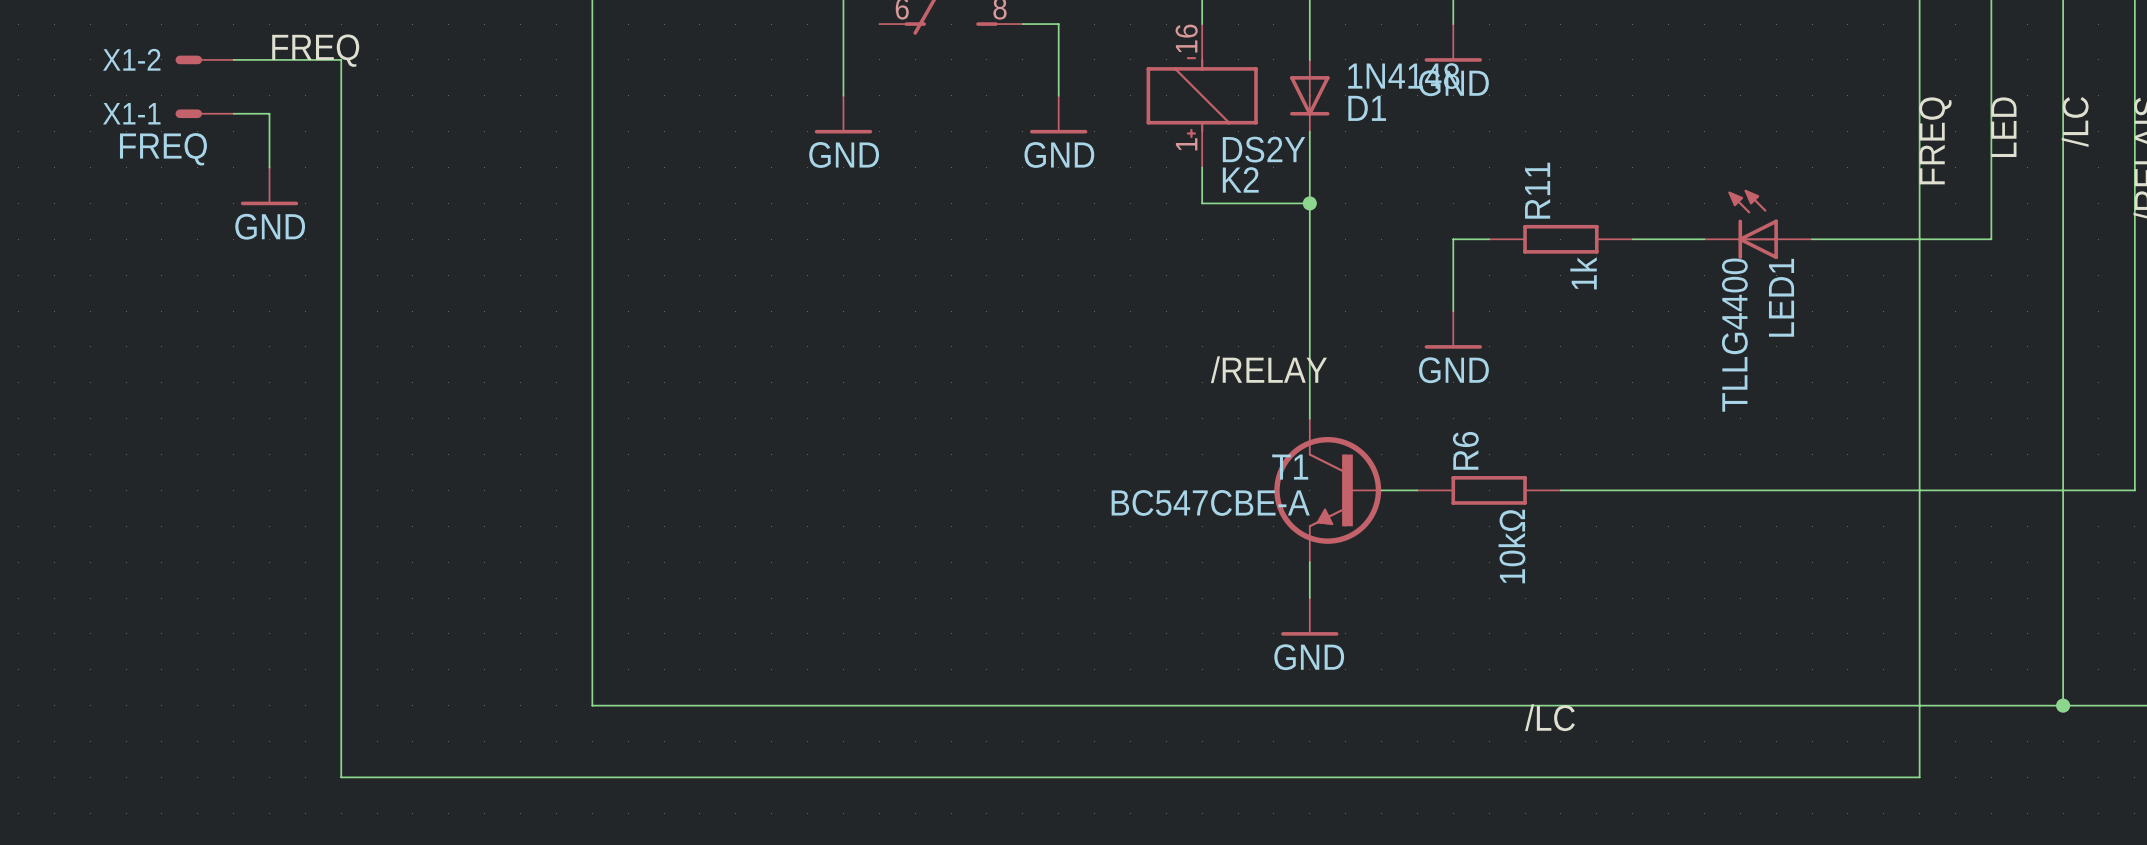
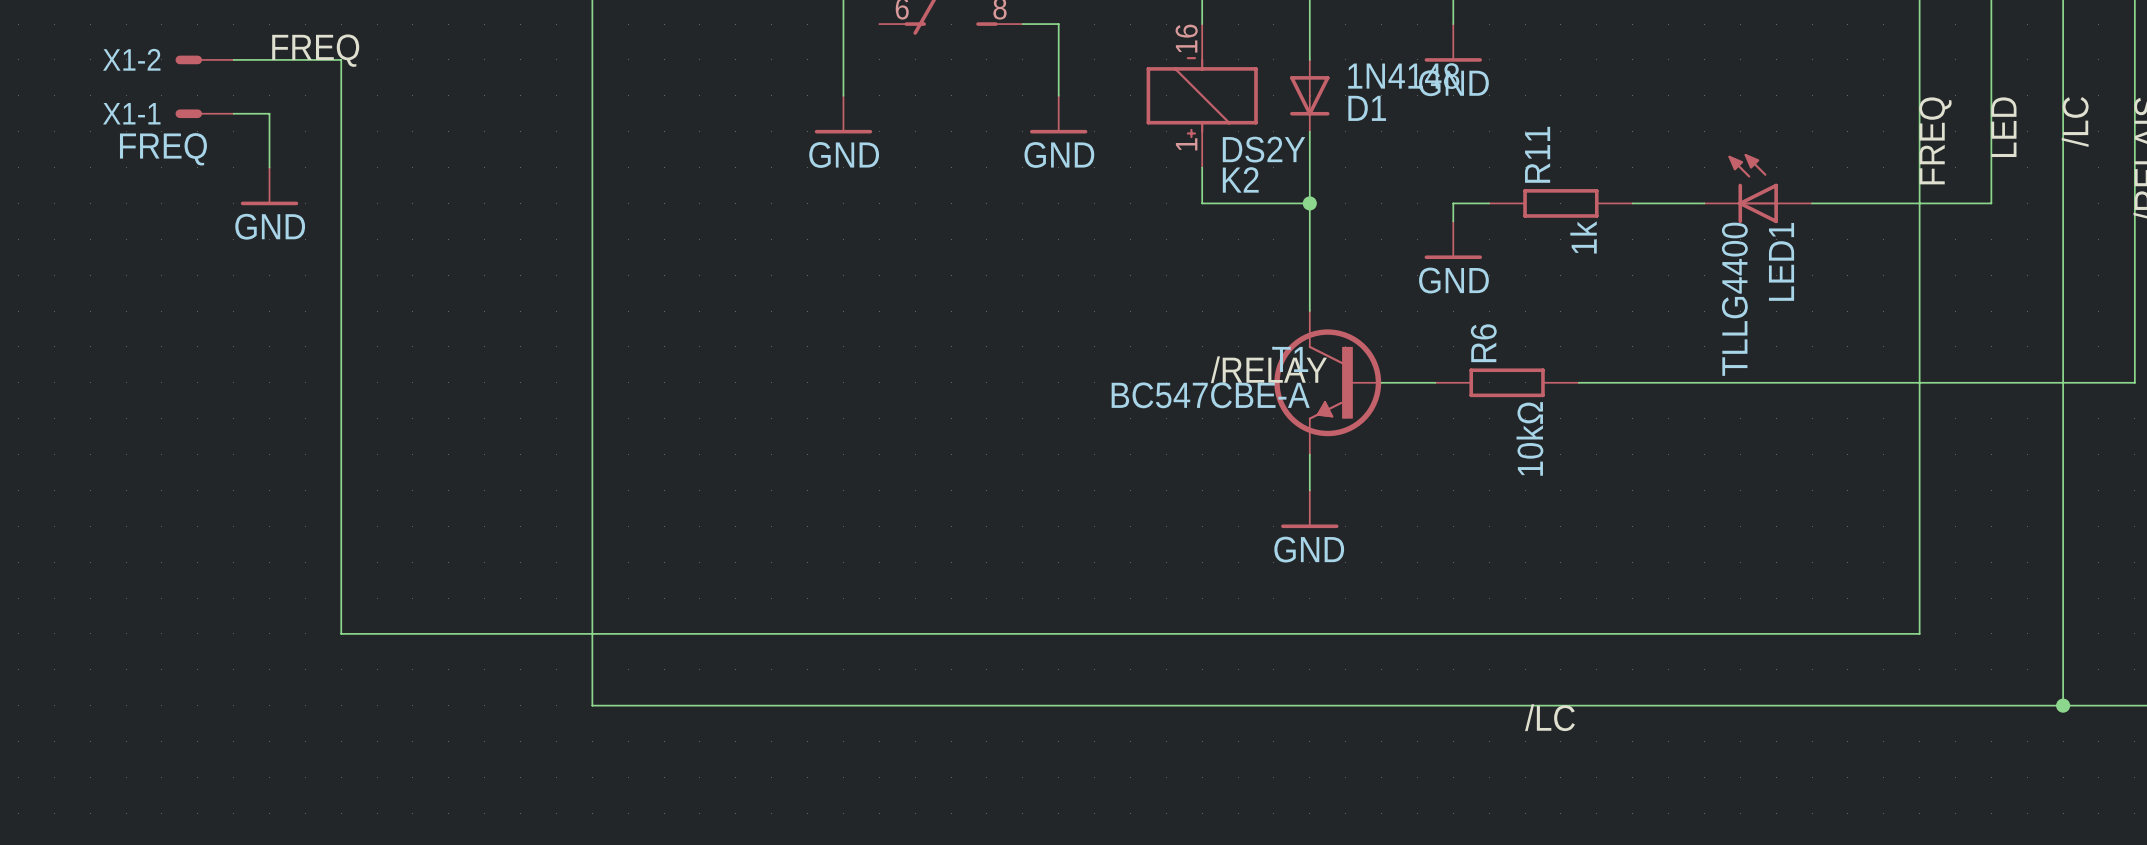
wire: none -> (1489, 203) (1453, 203) (1453, 221)
wire: (1991, 203) (1991, 239) (1812, 239) -> (1991, 203) (1812, 203)
LED1 position: (1758, 224) -> (1758, 188)
wire: (1489, 239) (1453, 239) (1453, 311) -> none
R11 position: (1560, 239) -> (1560, 203)
wire: (1632, 239) (1704, 239) -> (1632, 203) (1704, 203)
wire: (1309, 311) (1309, 418) -> none
power symbol position: GND (1453, 329) -> GND (1453, 240)
wire: none -> (1381, 382) (1435, 382)
wire: (2134, 382) (2134, 490) (1560, 490) -> (2134, 382) (1578, 382)
T1 position: (1327, 490) -> (1327, 382)
wire: (1381, 490) (1417, 490) -> none
R6 position: (1489, 490) -> (1507, 382)
wire: (1309, 562) (1309, 598) -> (1309, 454) (1309, 490)
power symbol position: GND (1309, 616) -> GND (1309, 509)
wire: (341, 633) (341, 777) (1919, 777) (1919, 633) -> (341, 633) (1919, 633)

